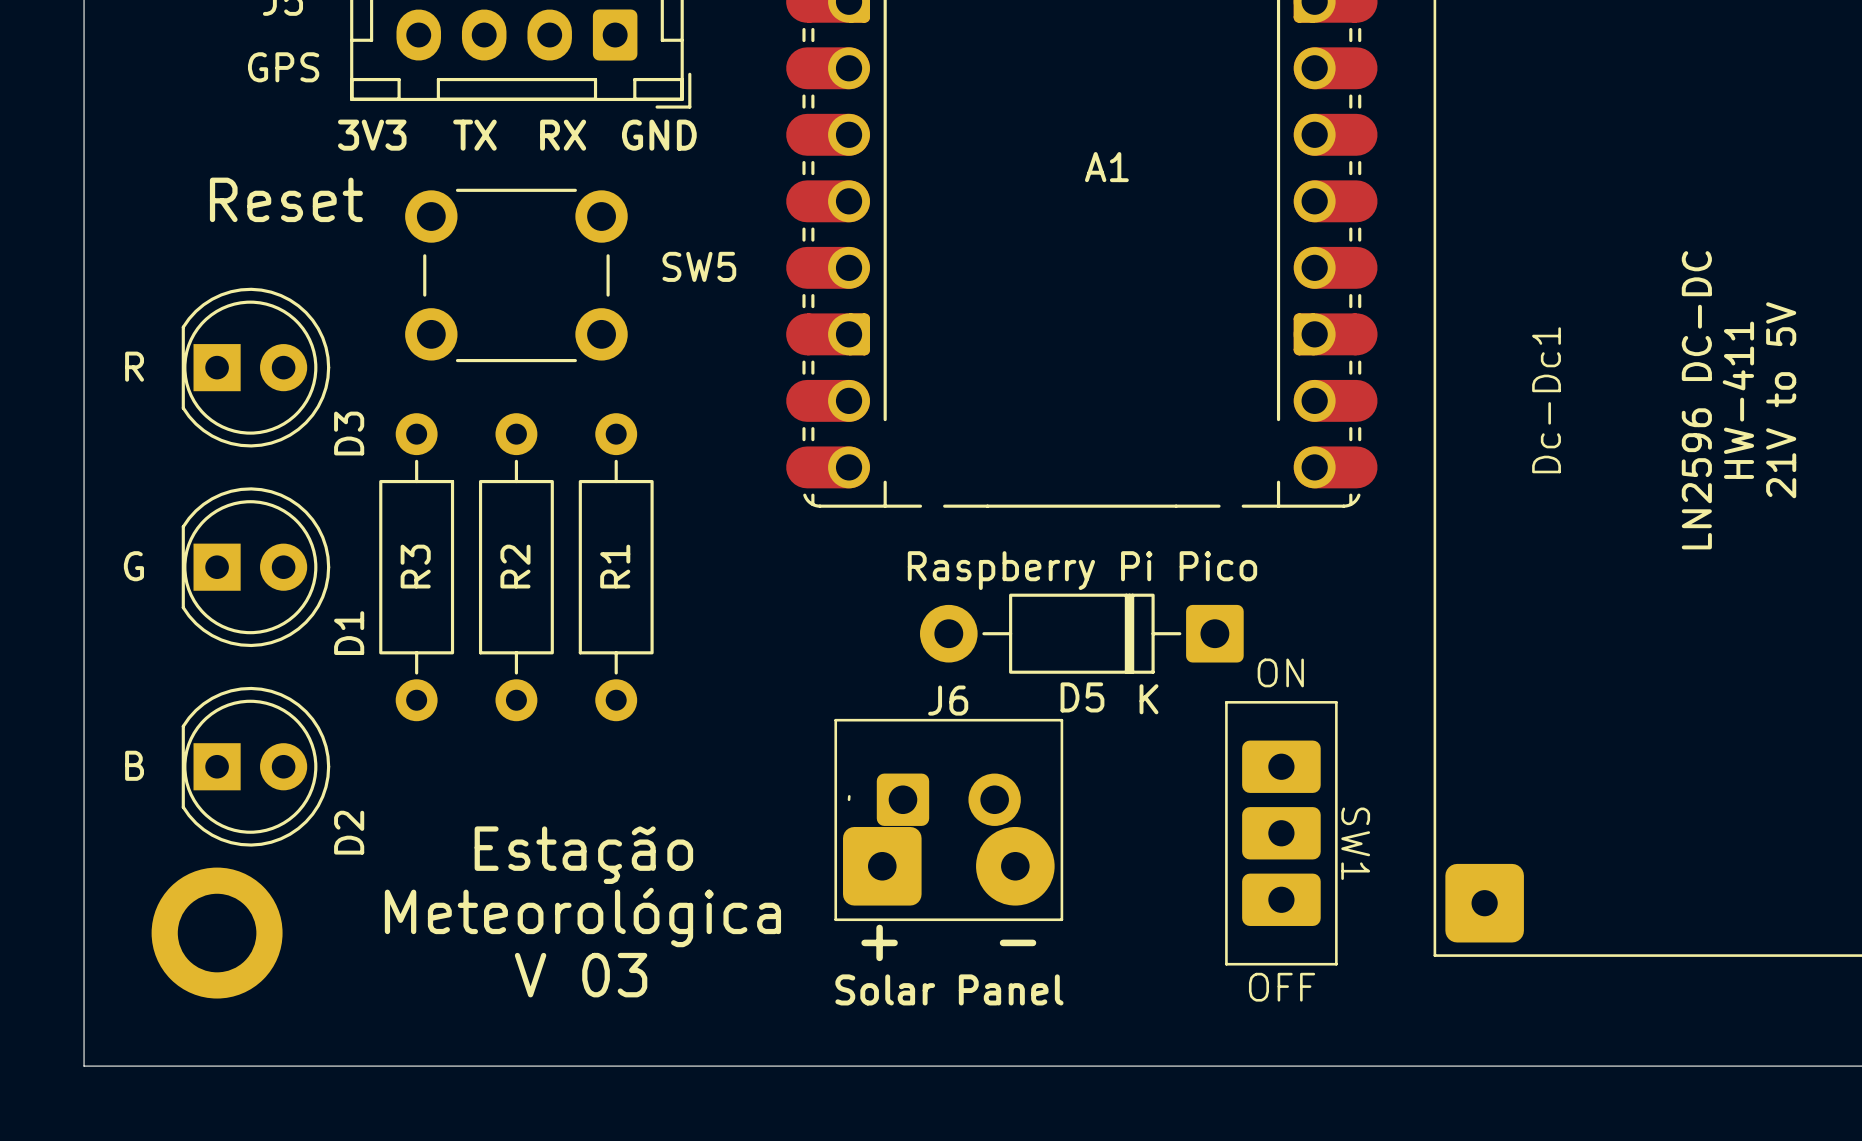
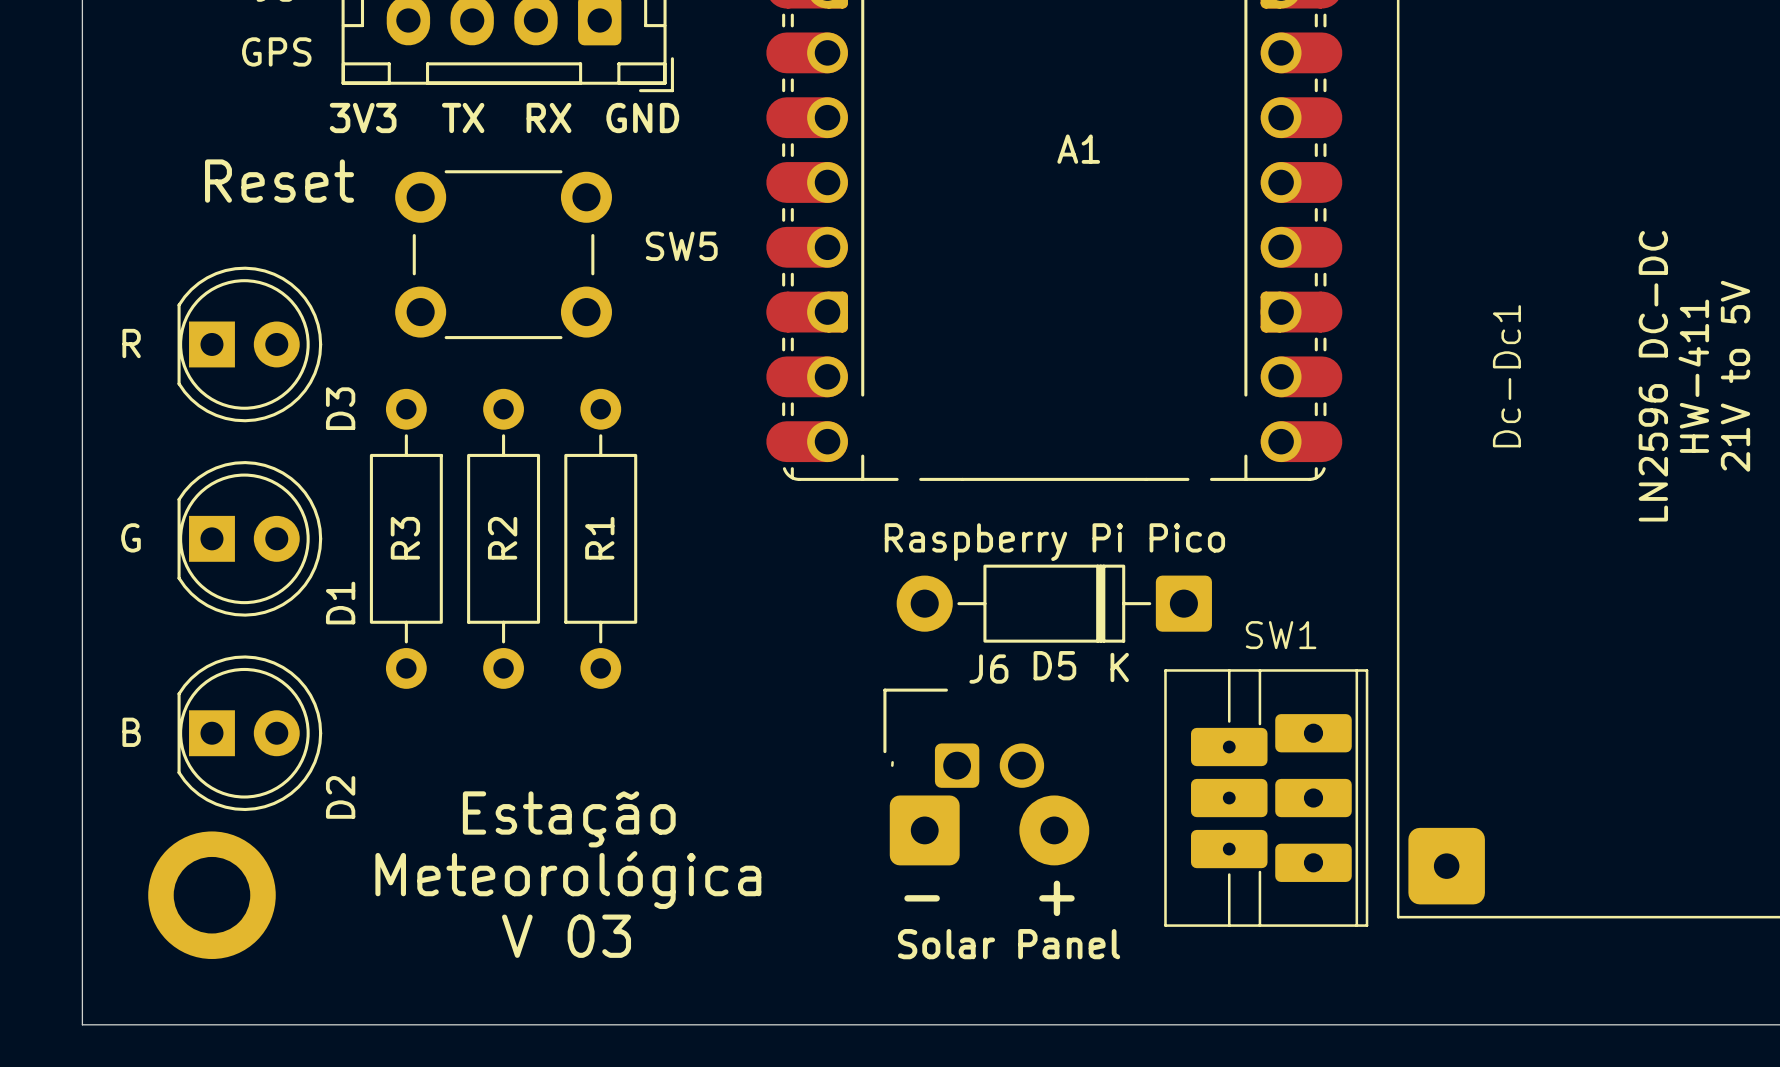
SW1 footprint: [1225, 701, 1338, 966] -> [1164, 669, 1369, 927]
J6 footprint: [834, 718, 1064, 922] -> [883, 688, 1090, 866]
SW1 name position: SW1 (1355, 843) -> SW1 (1281, 635)
text: none -> - + (989, 898)
text: + - (948, 942) -> none
text position: Solar Panel (949, 989) -> Solar Panel (1009, 944)

